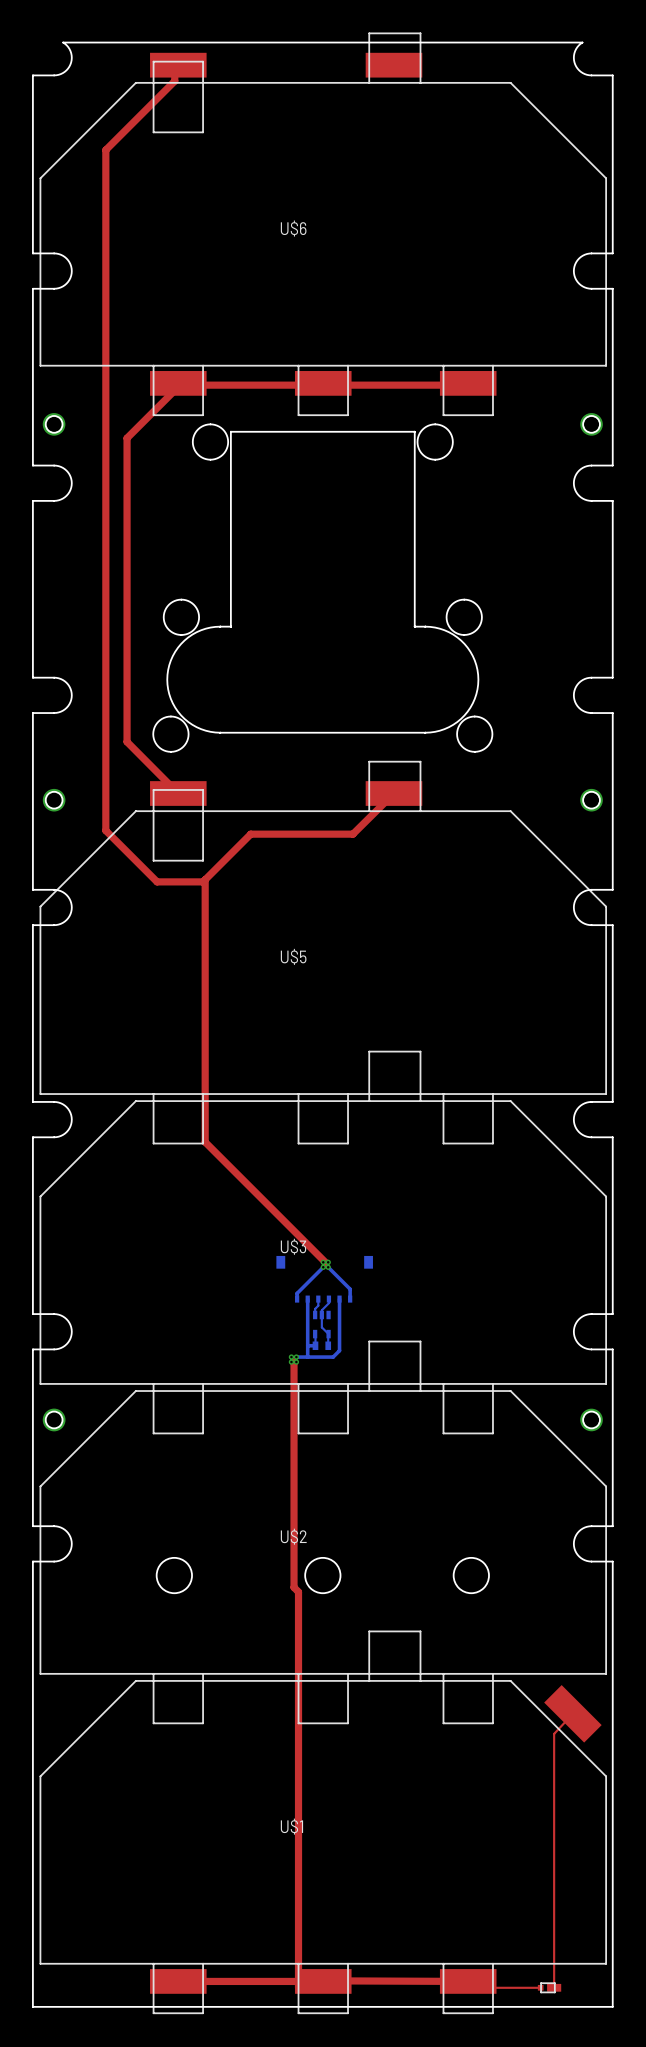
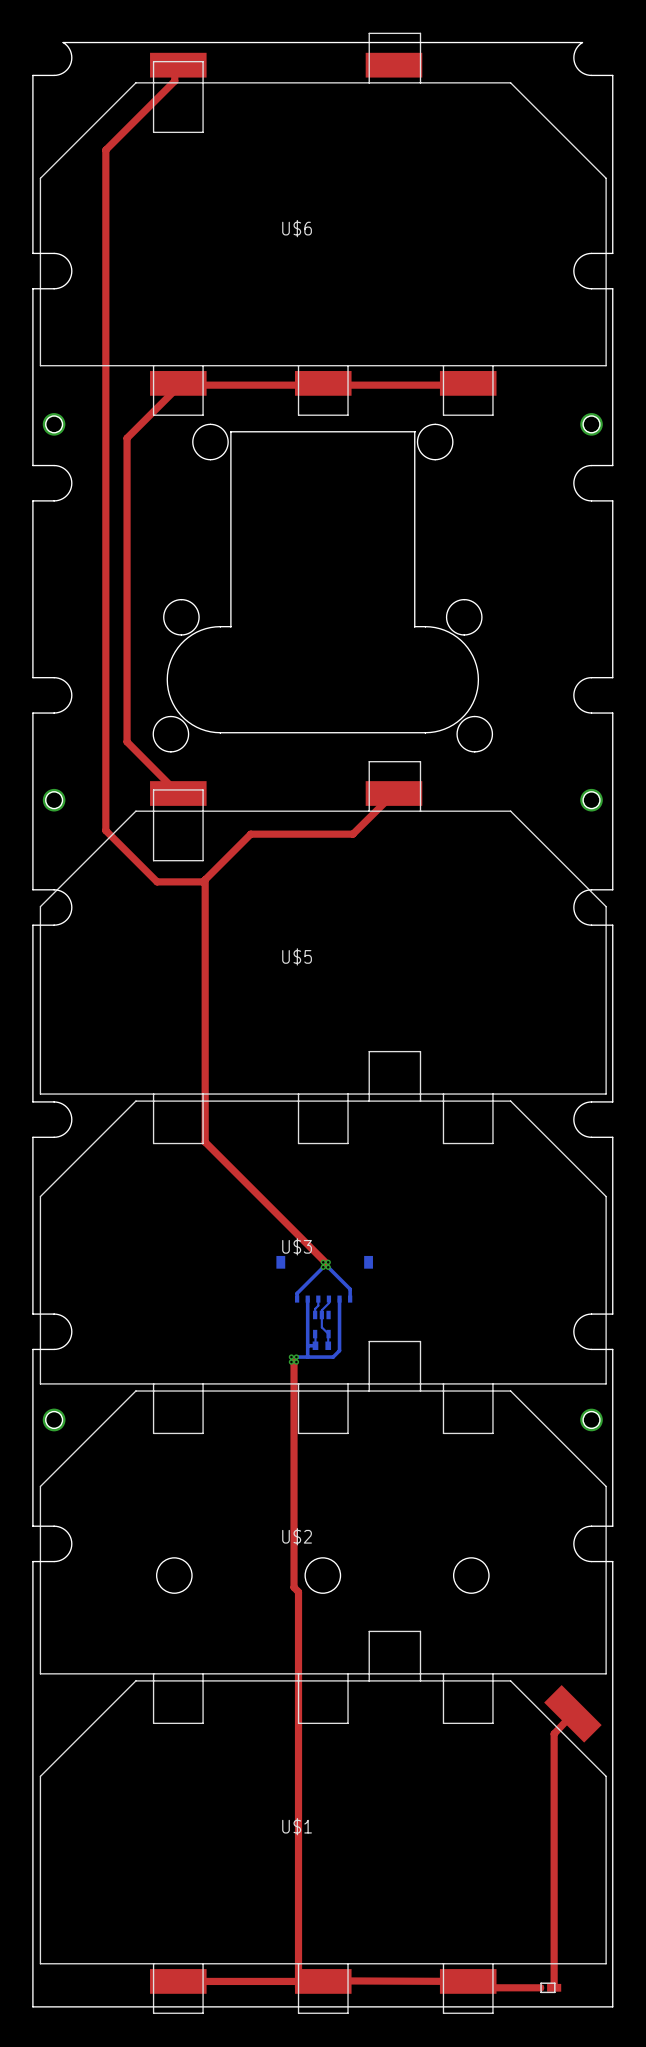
top track width: thin (572, 1713) (554, 1733) (554, 1987) -> thick (572, 1713) (554, 1733) (554, 1987)
top track width: thin (474, 1987) (540, 1987) -> thick (474, 1987) (540, 1987)

